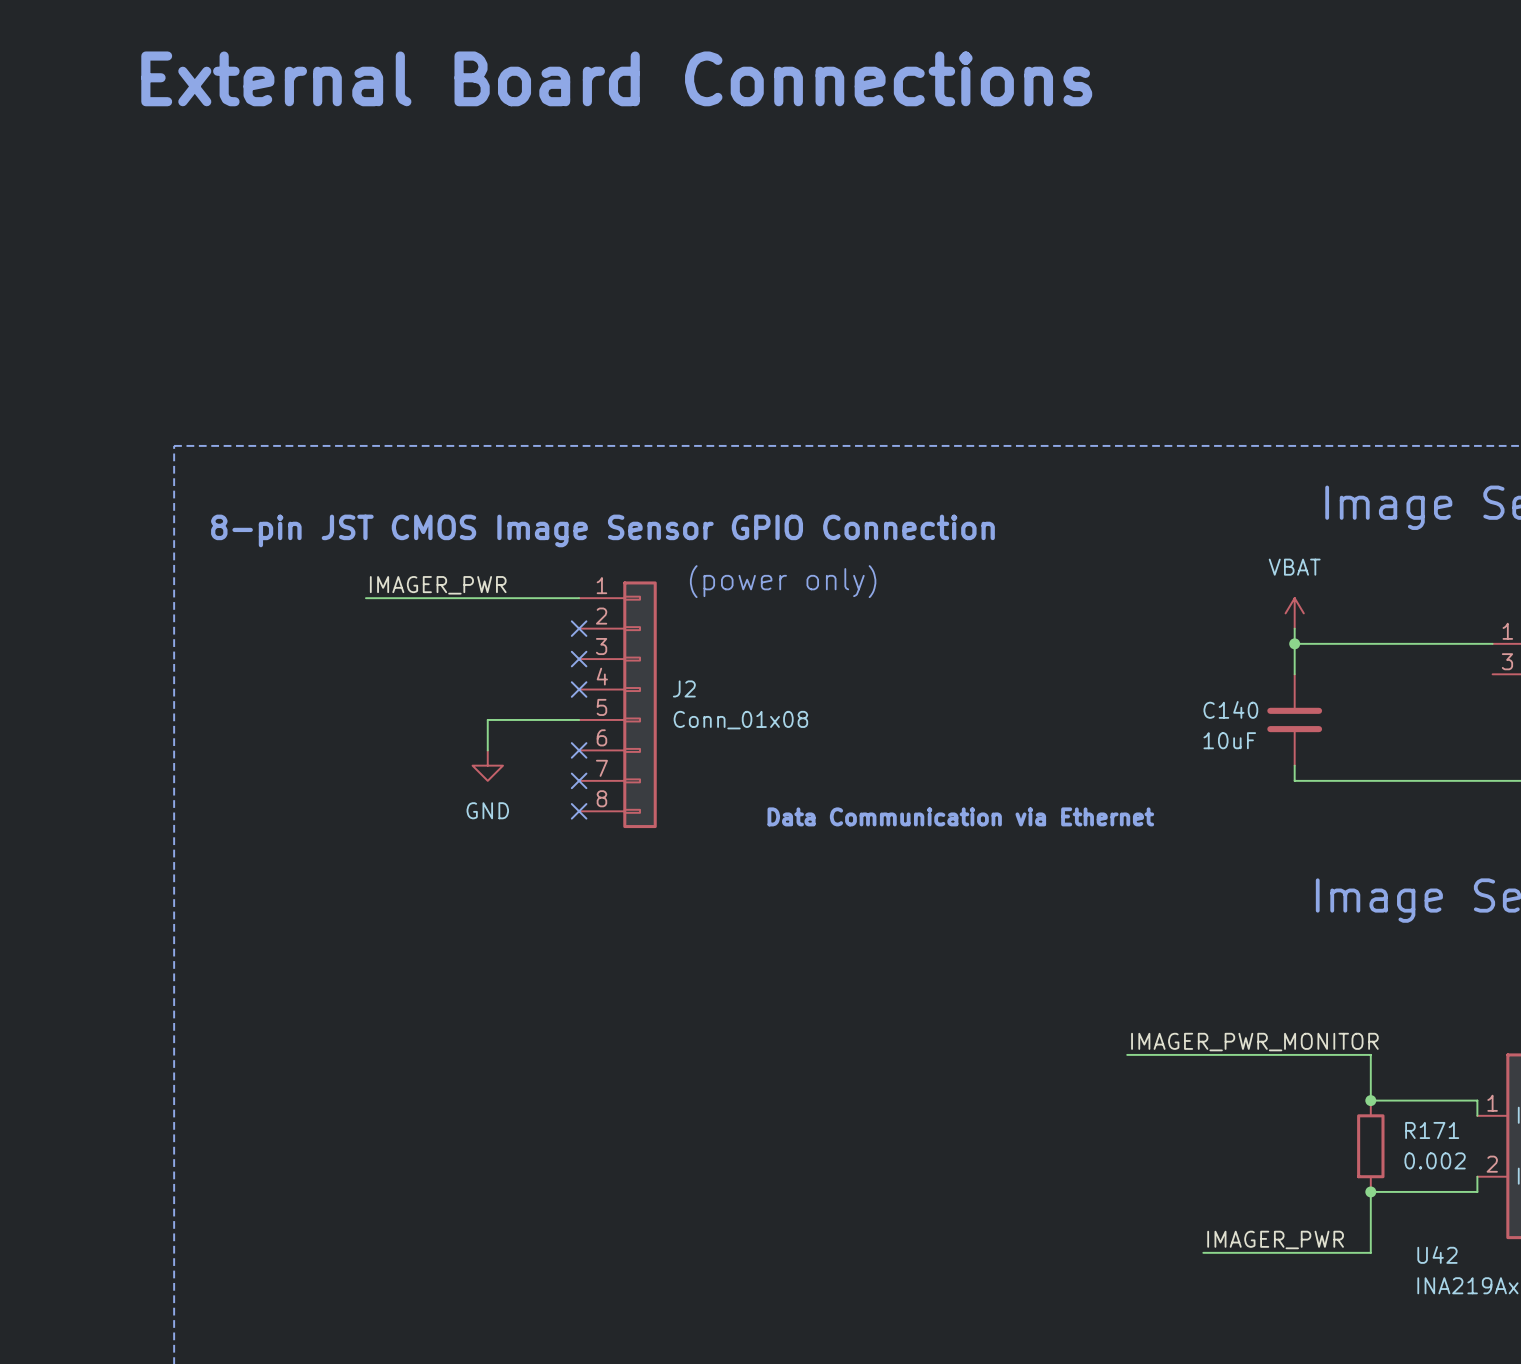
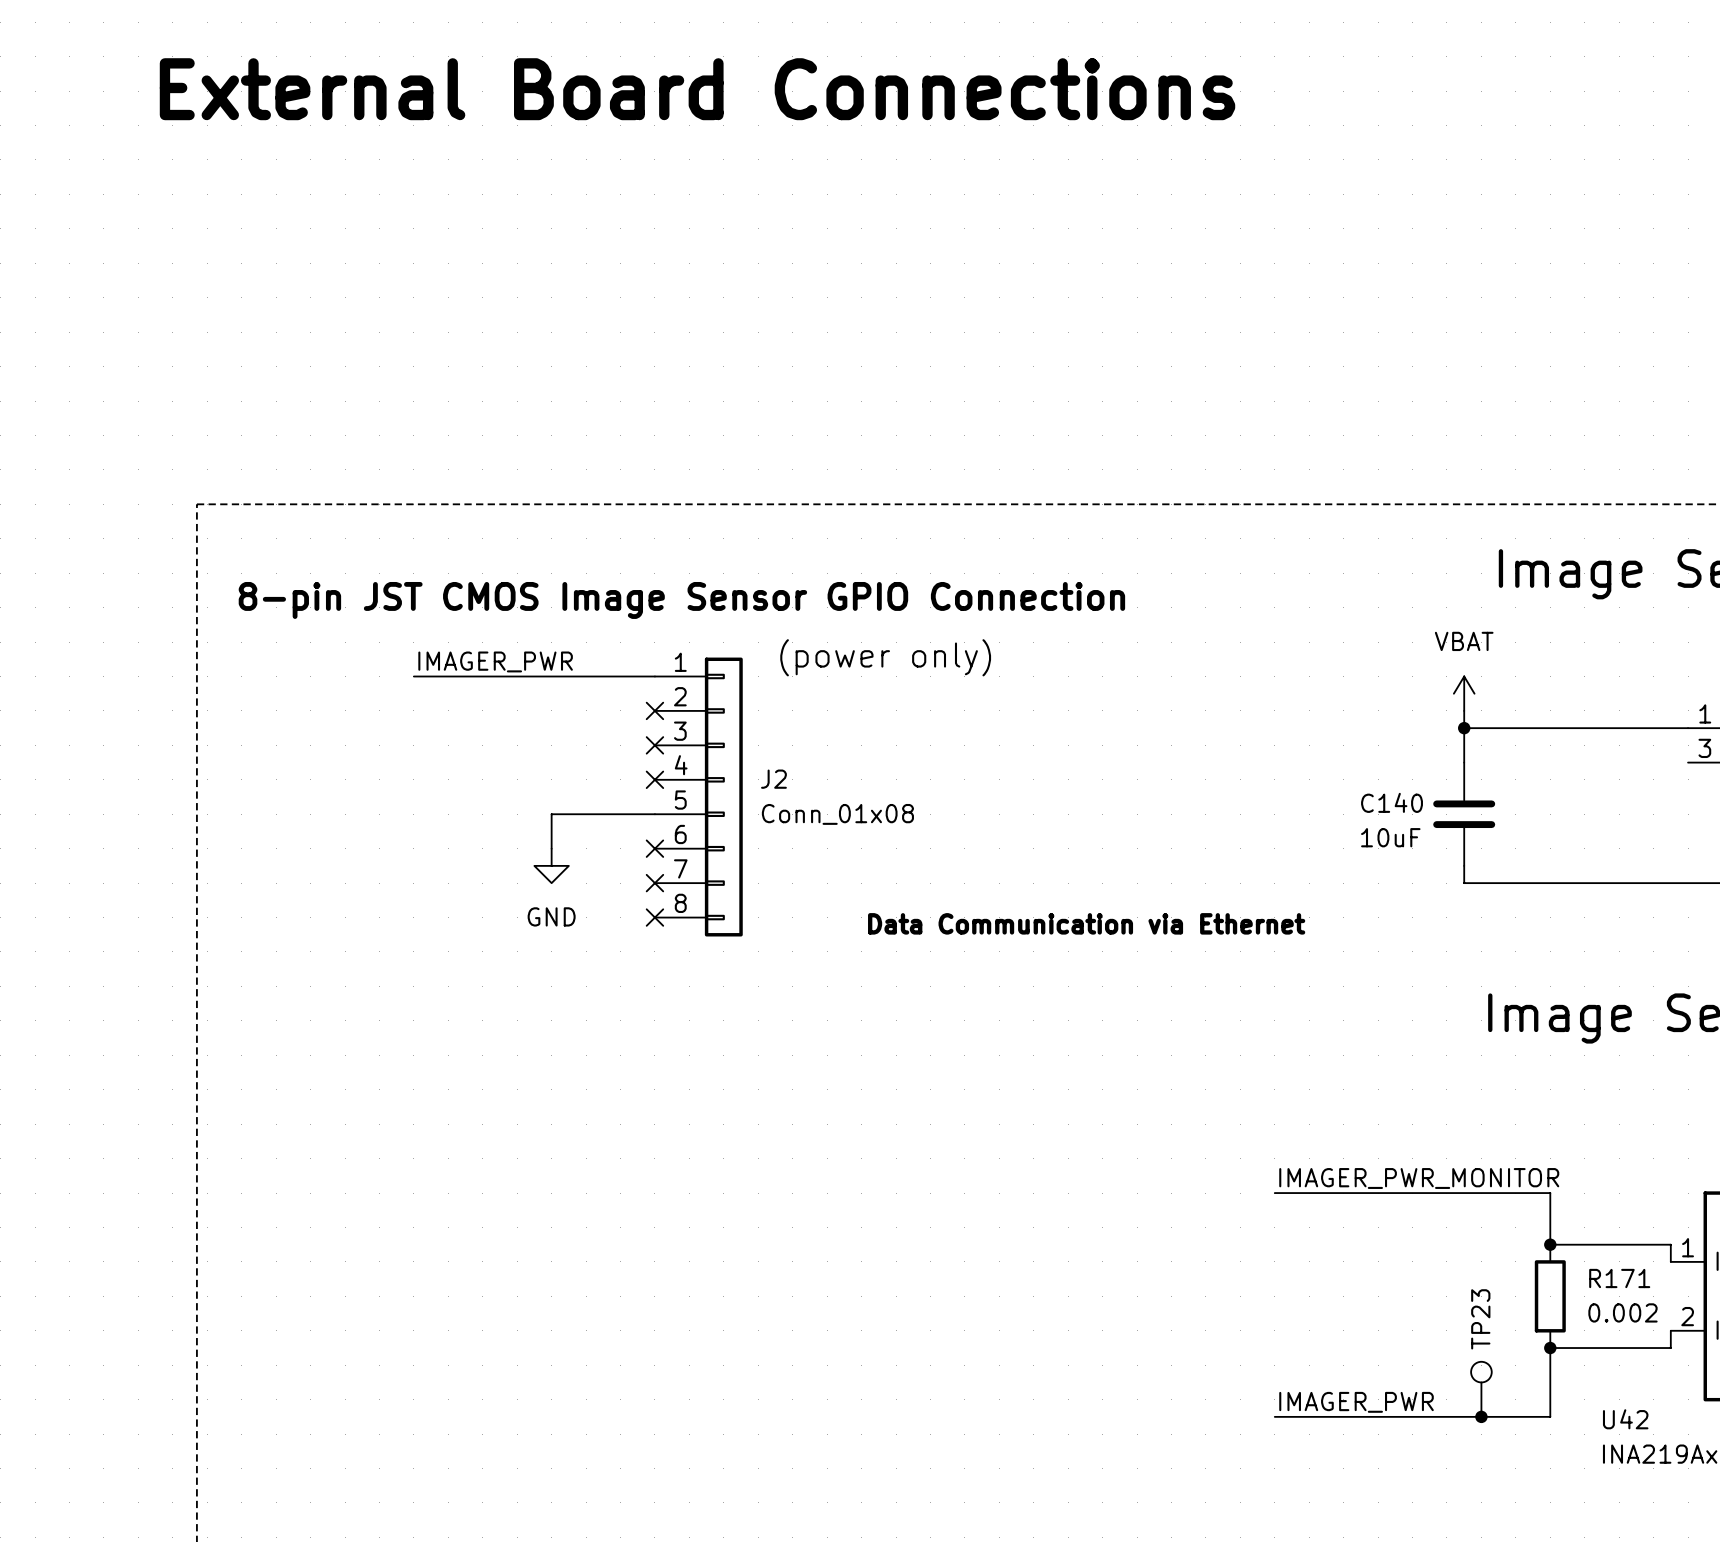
TP23: none -> (1481, 1389)
label position: IMAGER_PWR (1275, 1239) -> IMAGER_PWR (1356, 1402)
wire: none -> (1274, 1416) (1360, 1416)
junction: none -> (1481, 1416)

